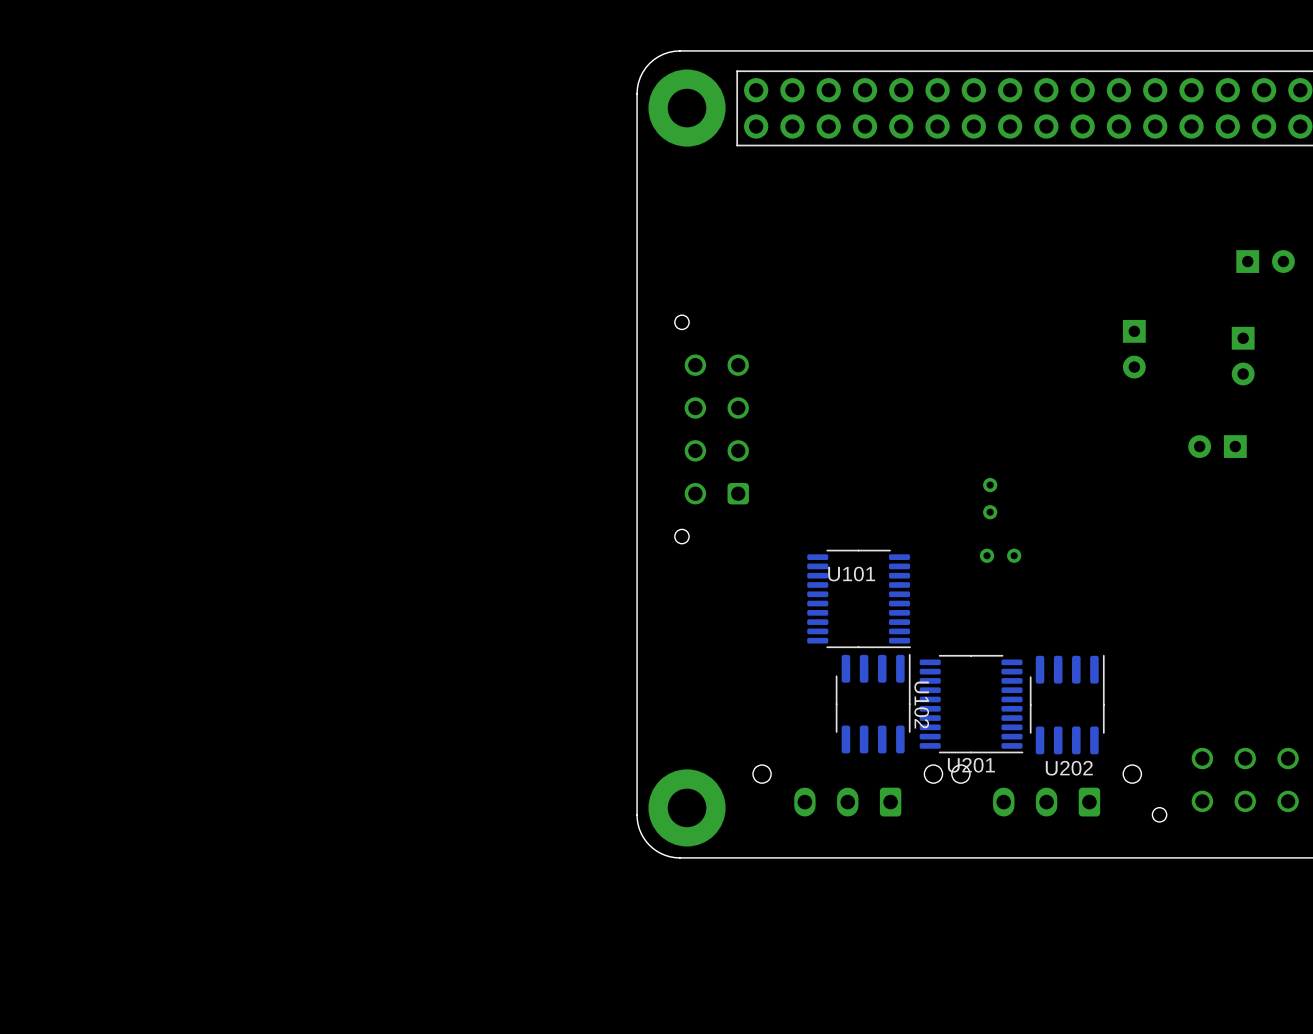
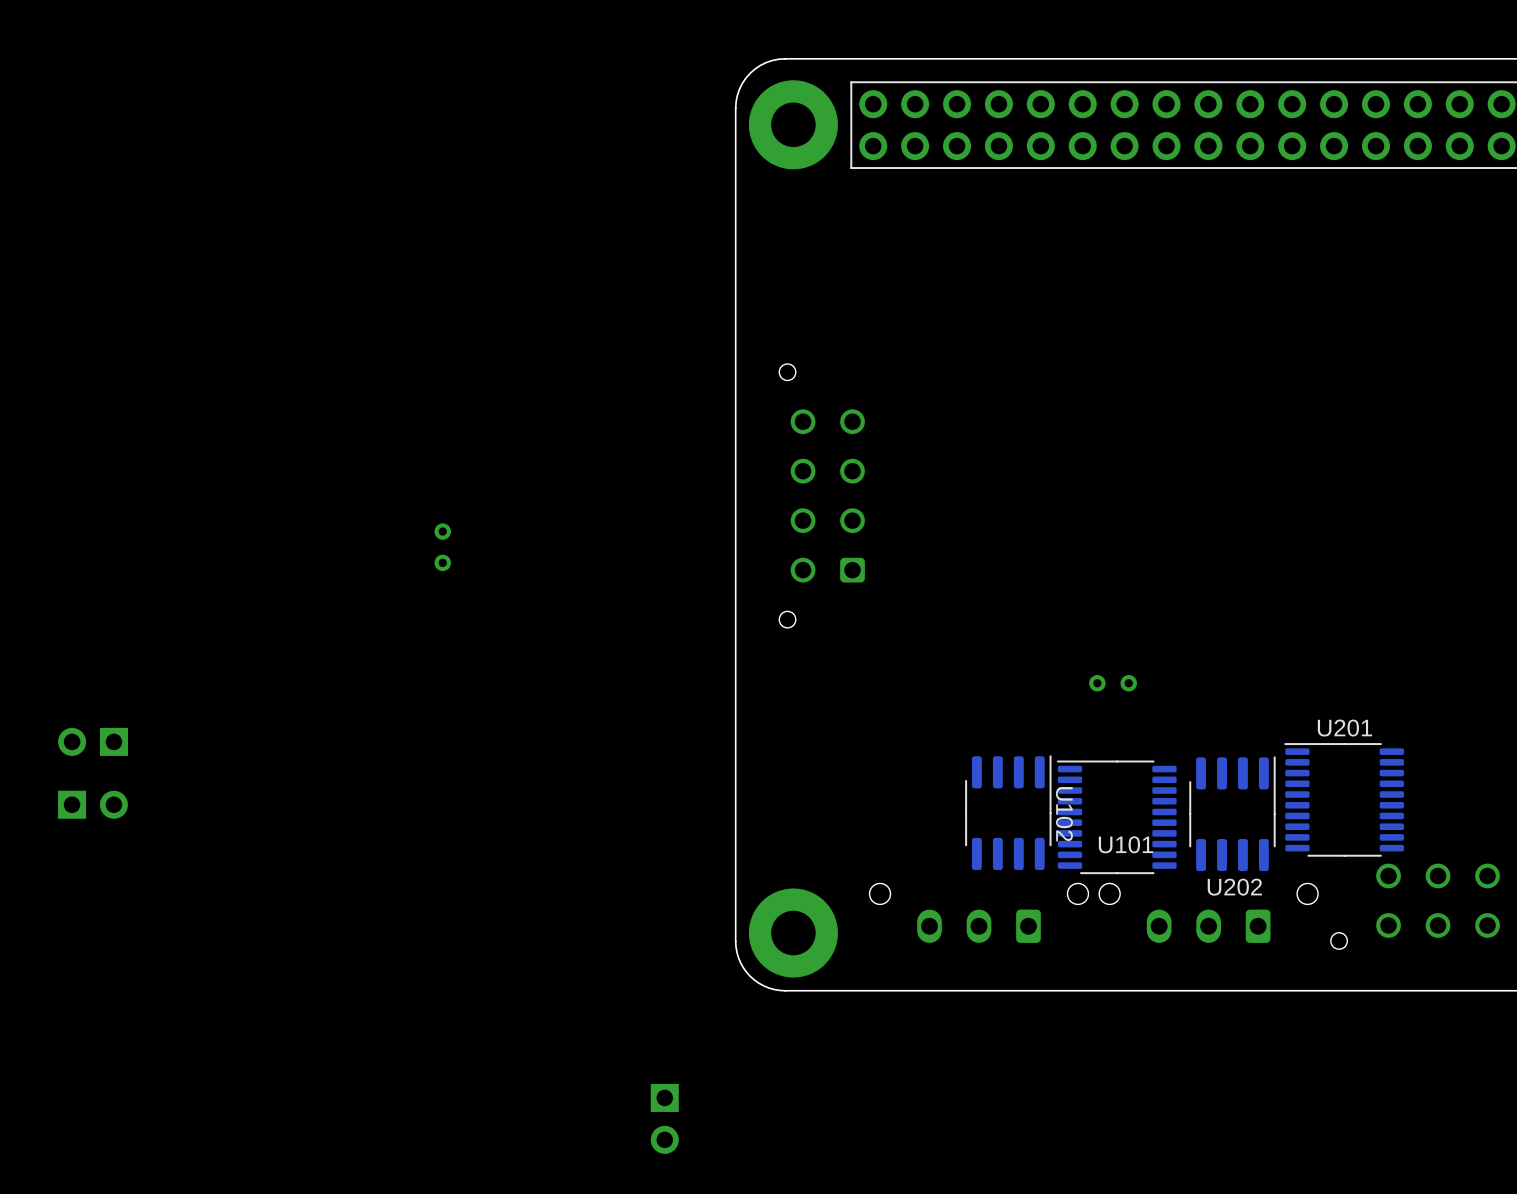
part: (1265, 261) -> none
part: (1134, 349) -> none
part: (1243, 356) -> none
part: (1217, 446) -> none
part: none -> (442, 547)
part: (990, 498) -> none
part: (1000, 555) -> none
part: none -> (1113, 683)
U101 rotation: 0° (859, 598) -> 180° (1116, 817)
U101 position: (859, 598) -> (1116, 817)
part: none -> (93, 741)
part: none -> (92, 804)
U201 rotation: 0° (971, 704) -> 180° (1344, 799)
U201 position: (971, 704) -> (1344, 799)
part: none -> (664, 1118)

